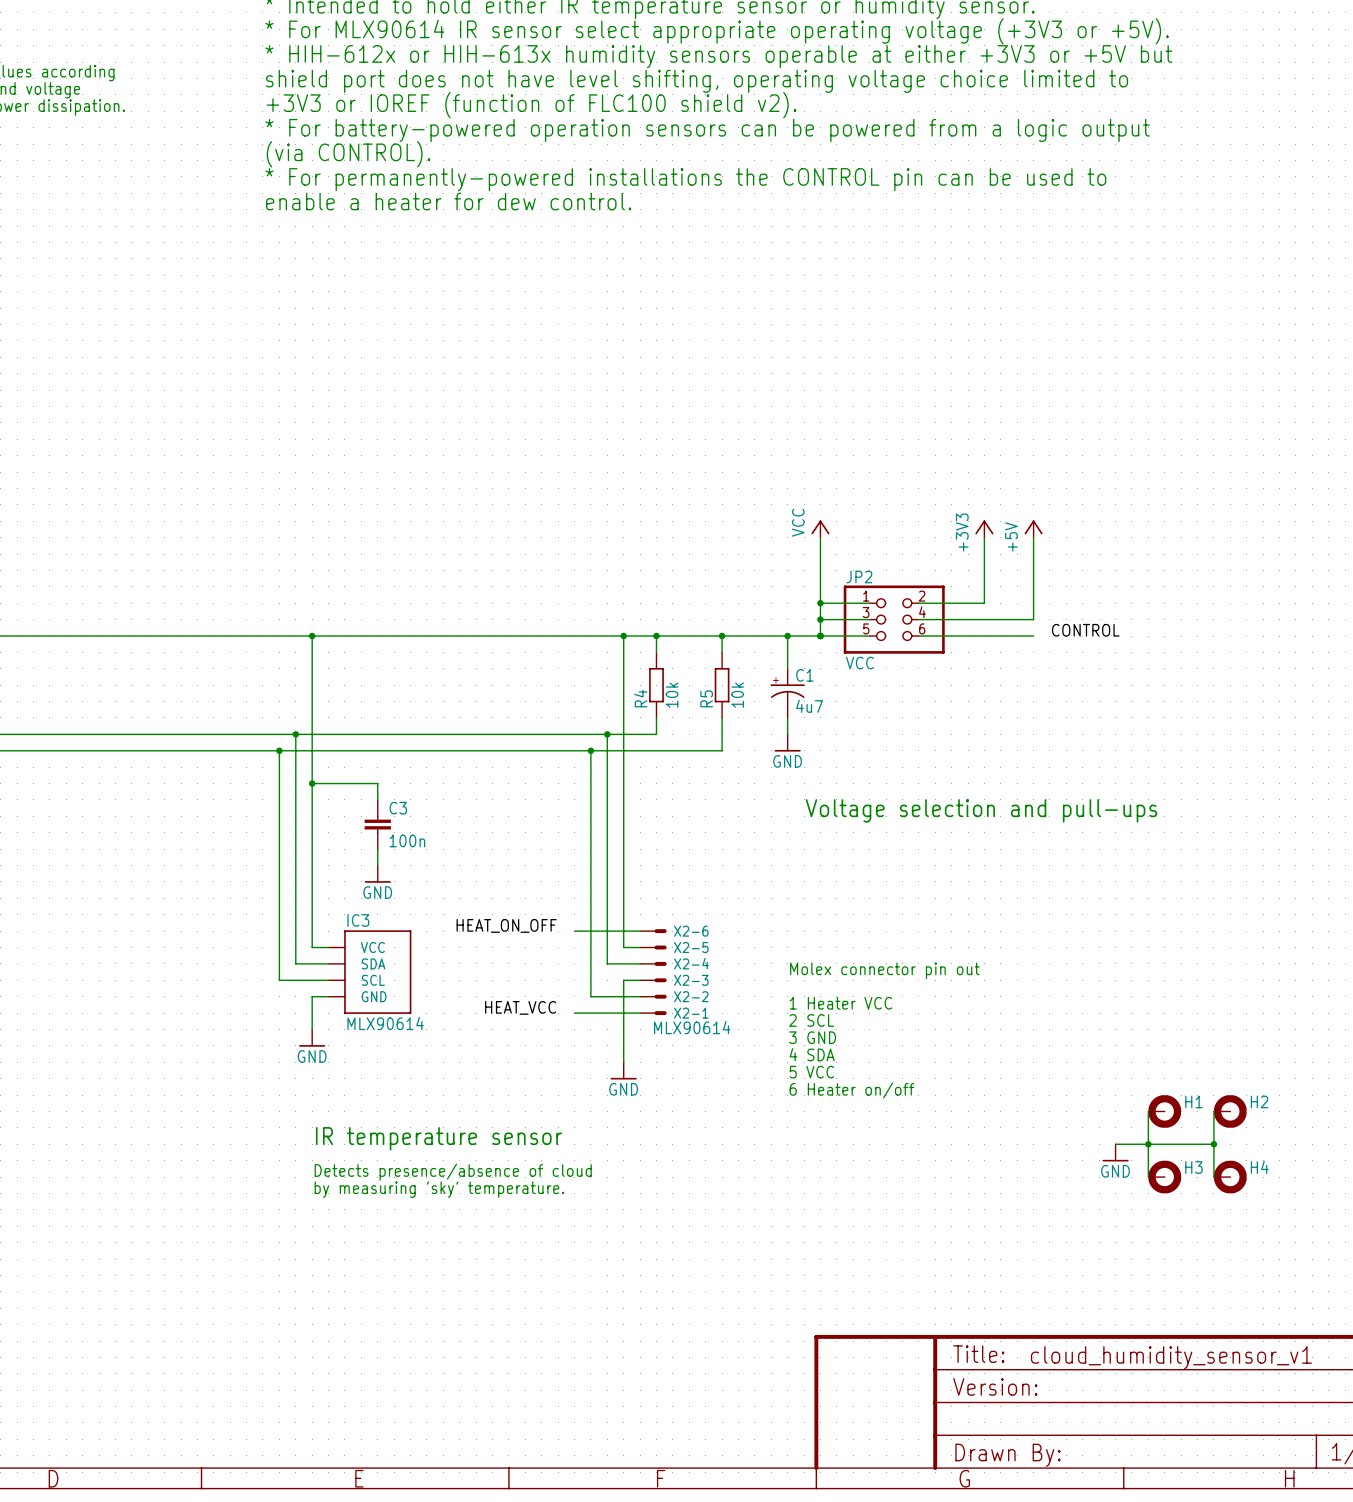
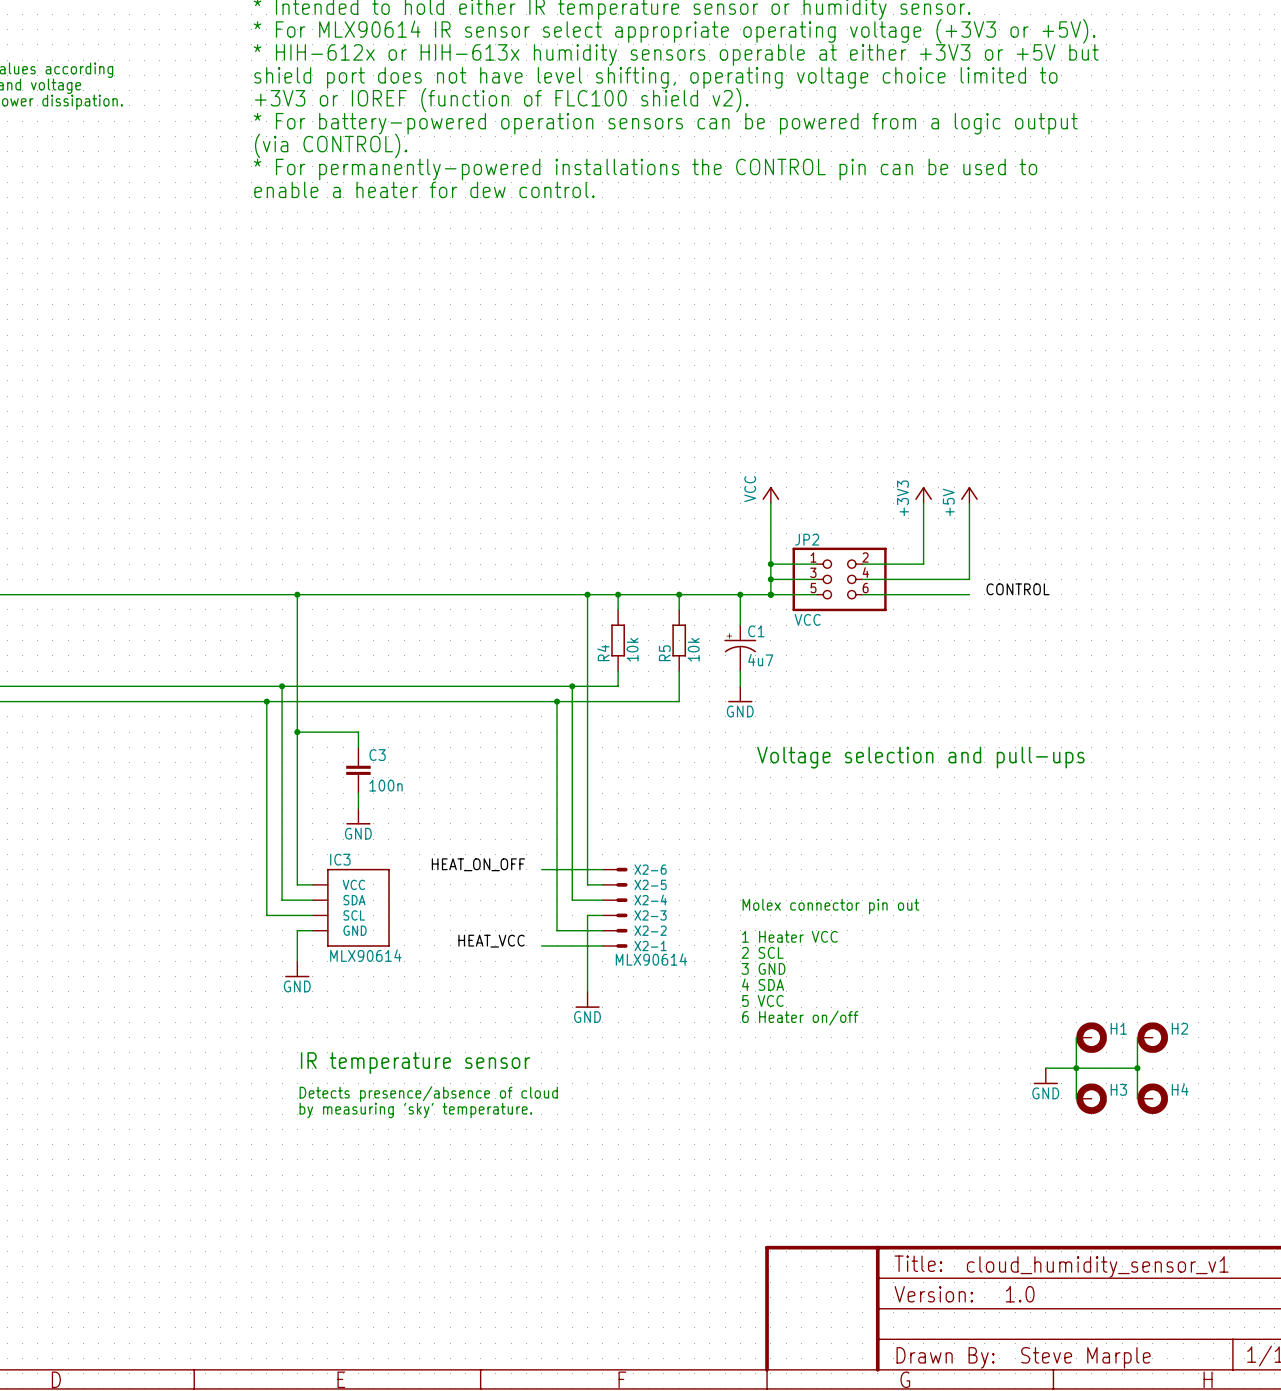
text: none -> 1.0 (1020, 1294)
text: none -> Steve Marple (1085, 1357)

